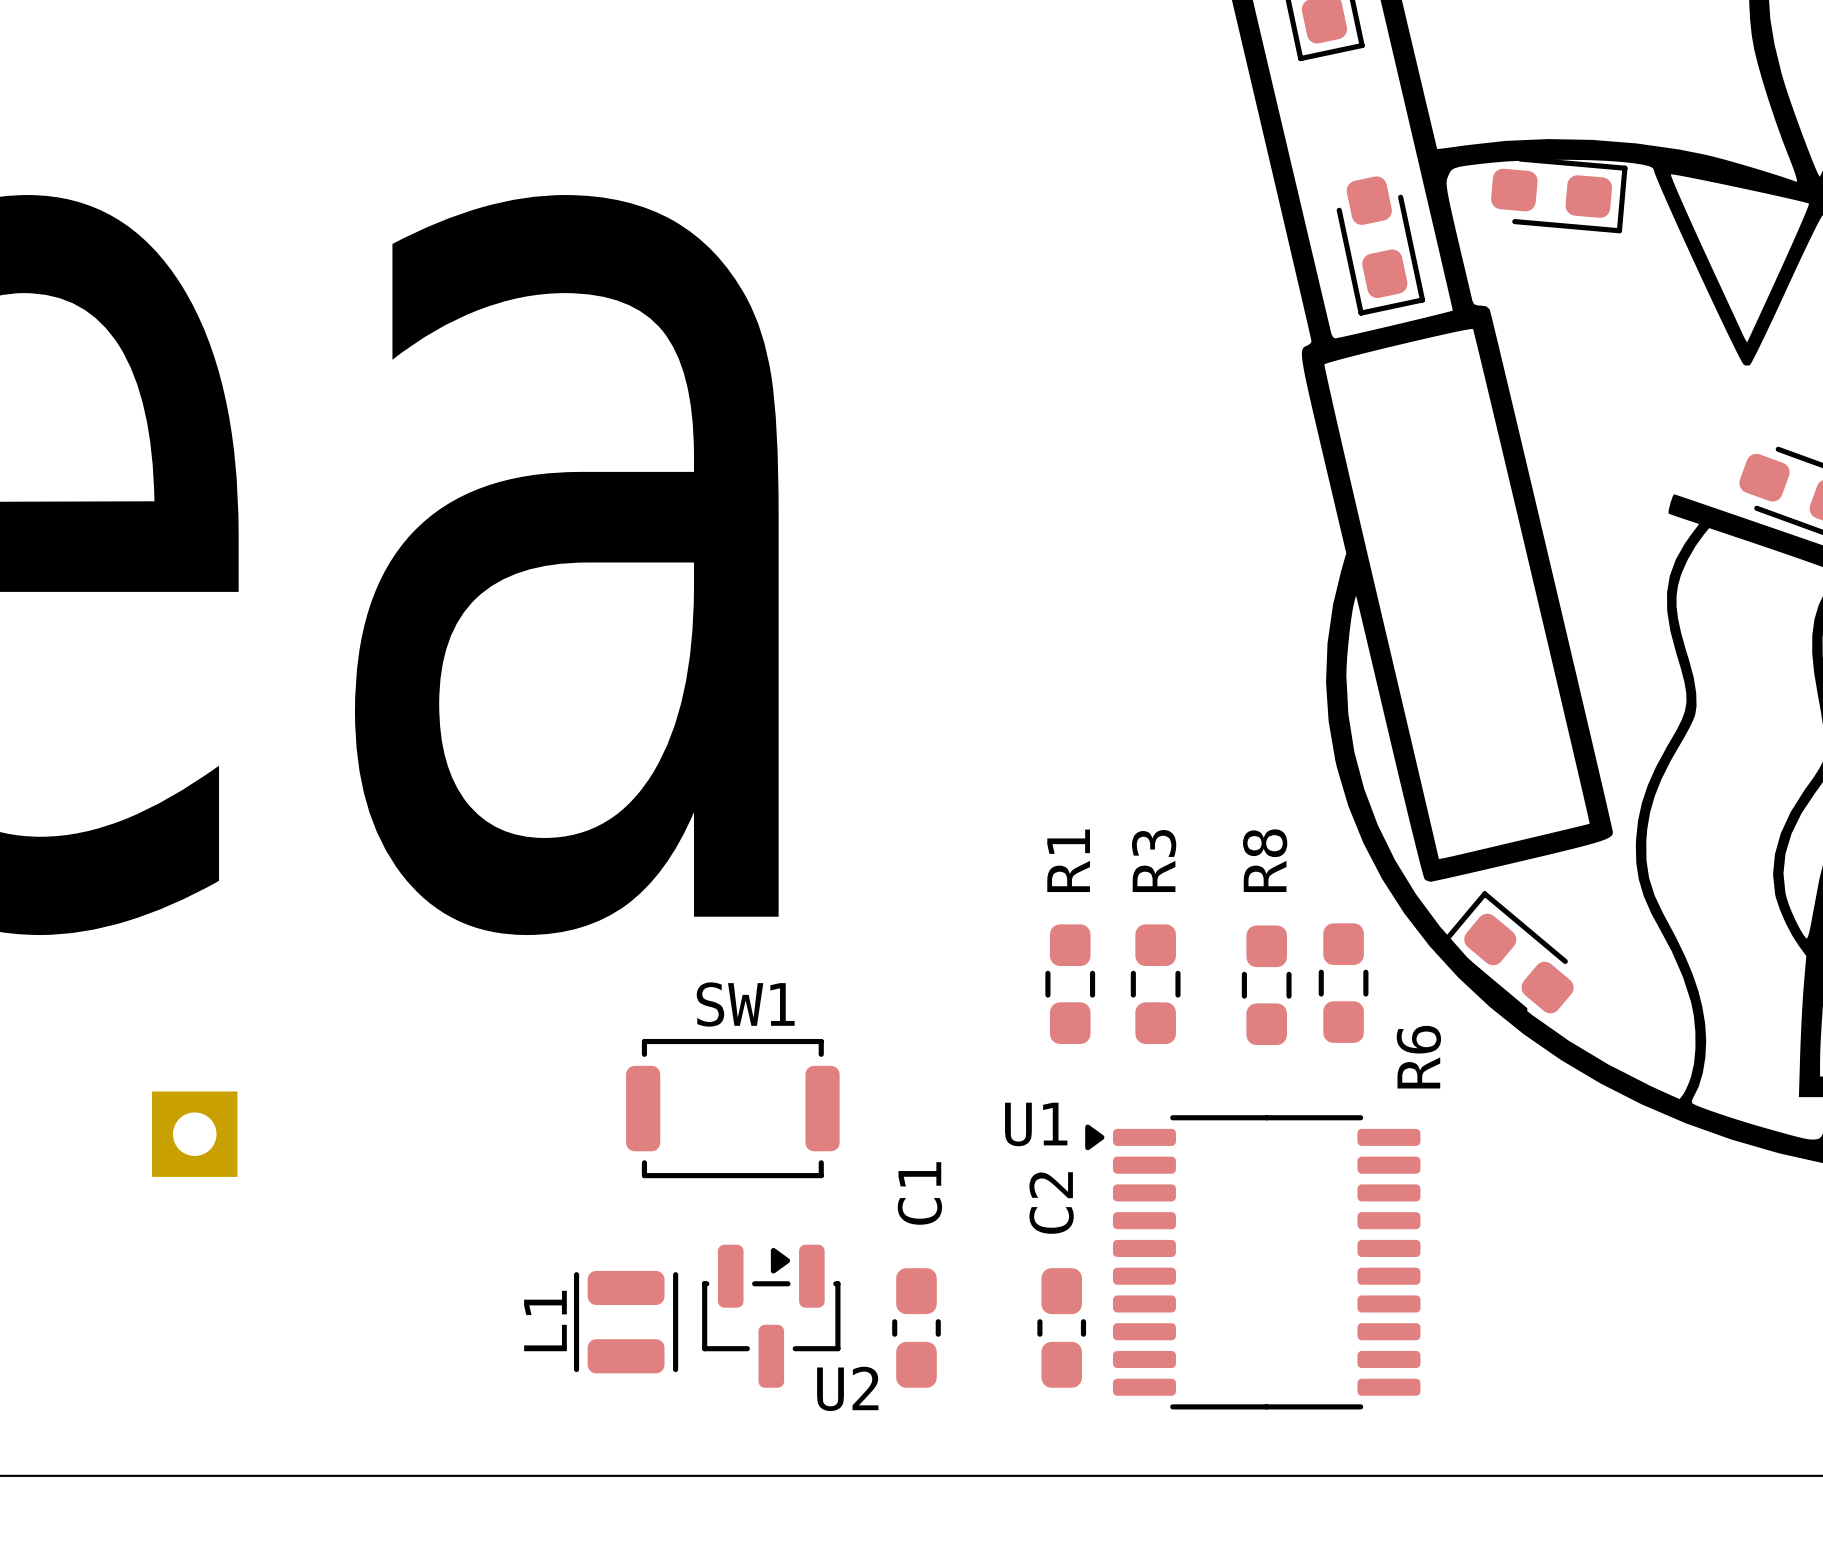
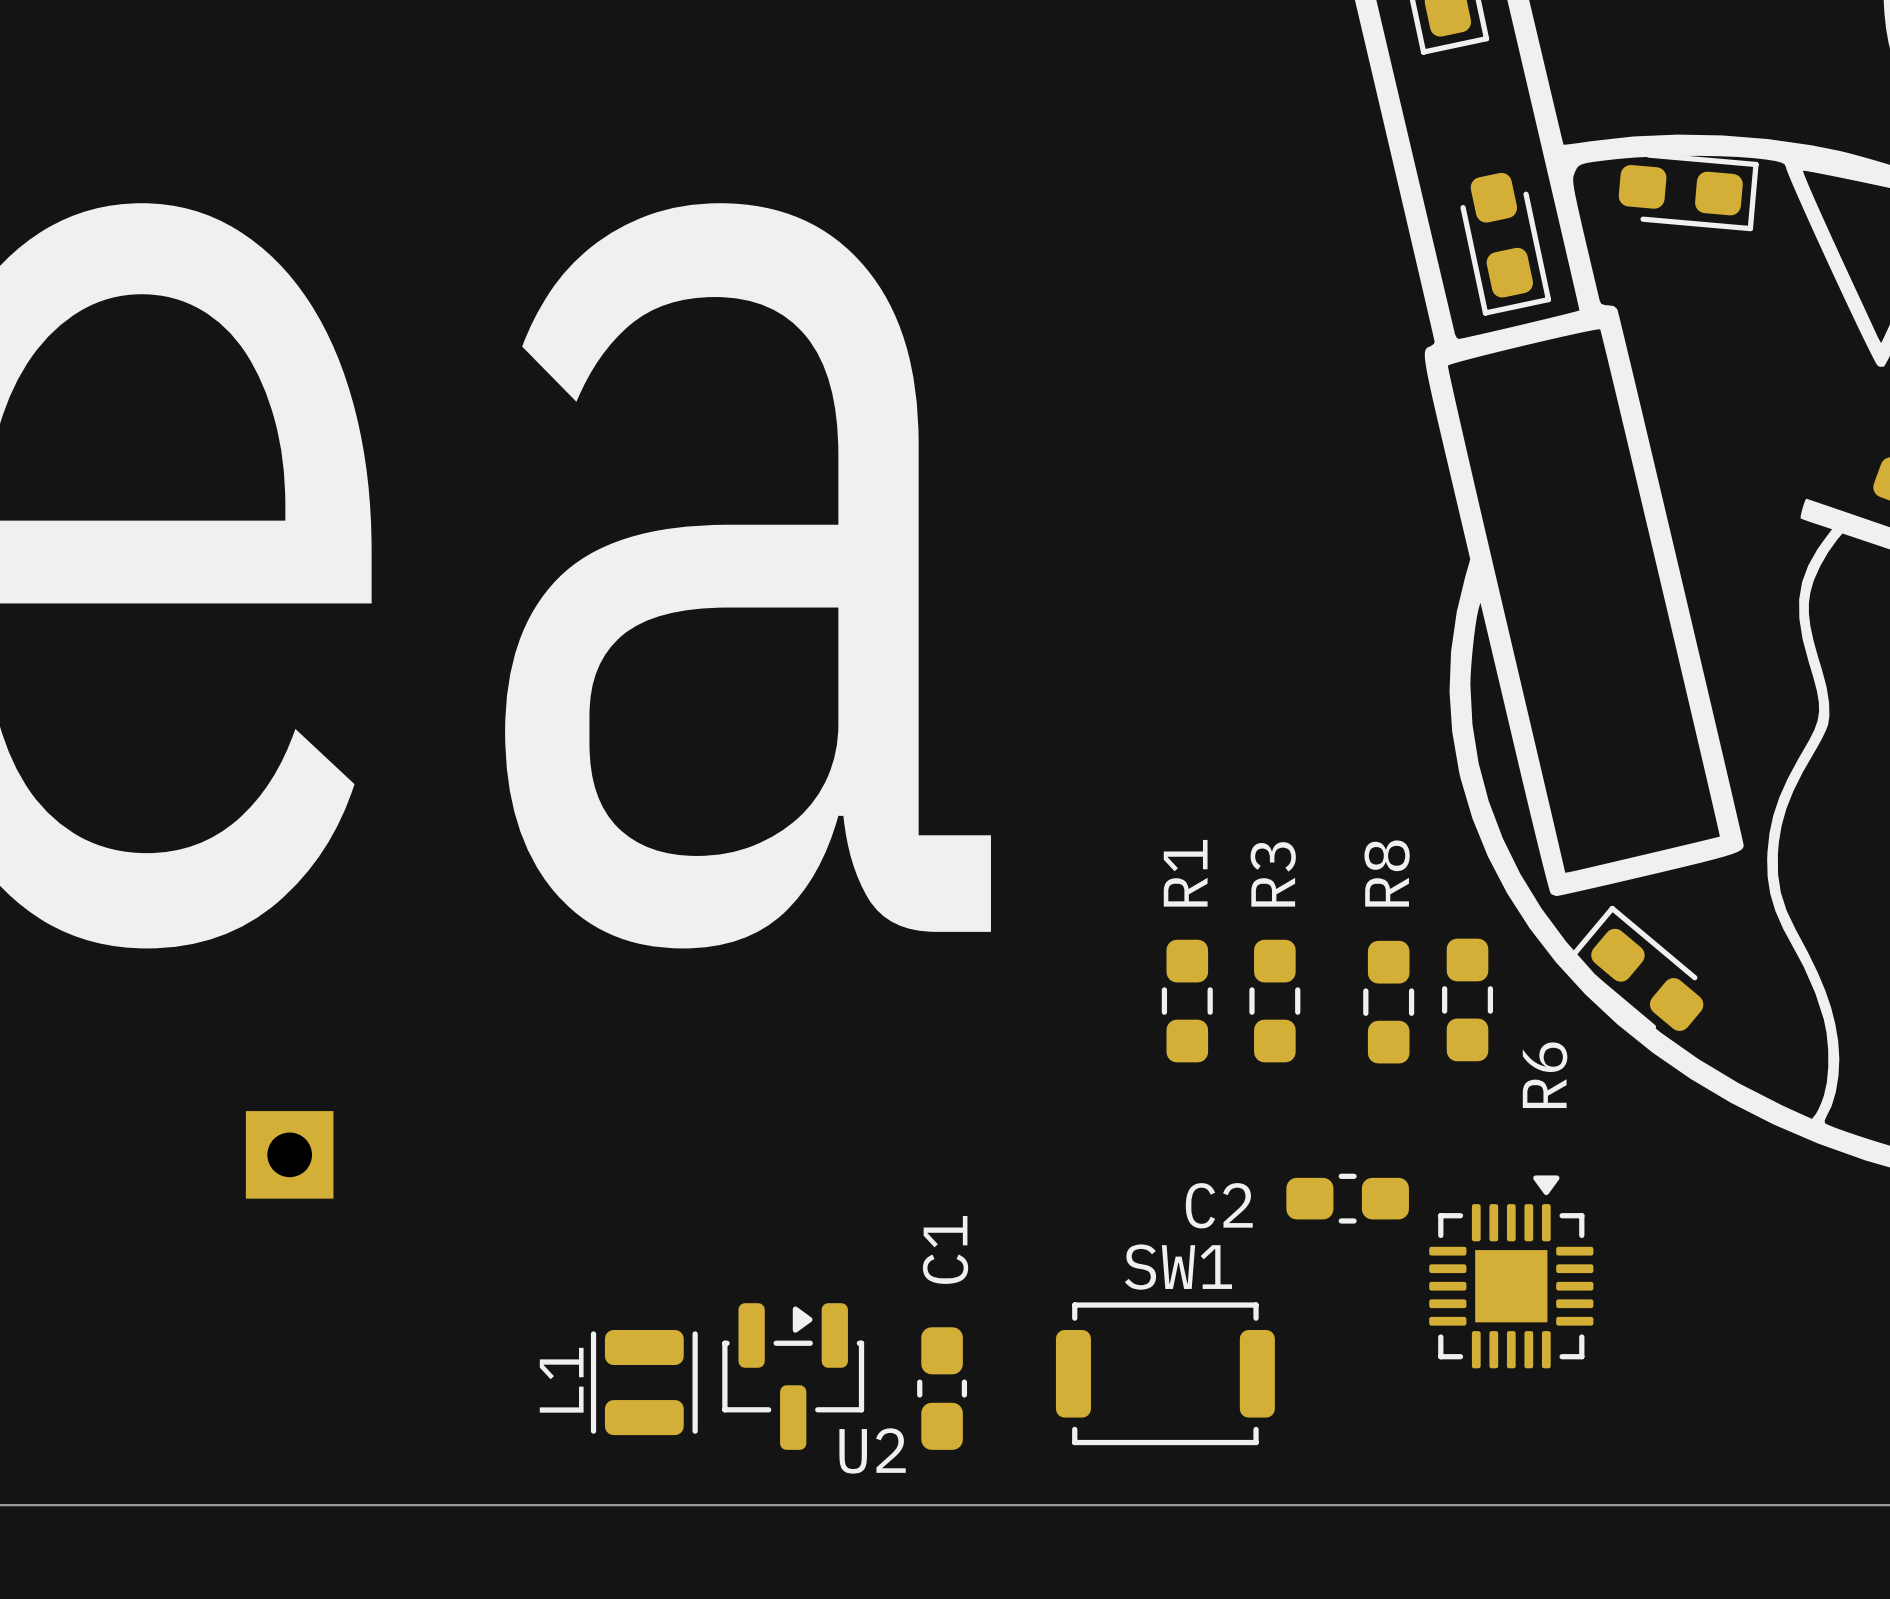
SW1 position: (732, 1108) -> (1165, 1373)
C2 name position: C2 (1051, 1203) -> C2 (1219, 1205)
part: none -> (1511, 1271)
U1: (1252, 1262) -> none
U2 position: (771, 1316) -> (793, 1376)
L1 position: (626, 1322) -> (644, 1382)
C1 position: (916, 1327) -> (942, 1388)
C2 rotation: 0° (1061, 1327) -> 90° clockwise (1347, 1198)
C2 position: (1061, 1327) -> (1347, 1198)

